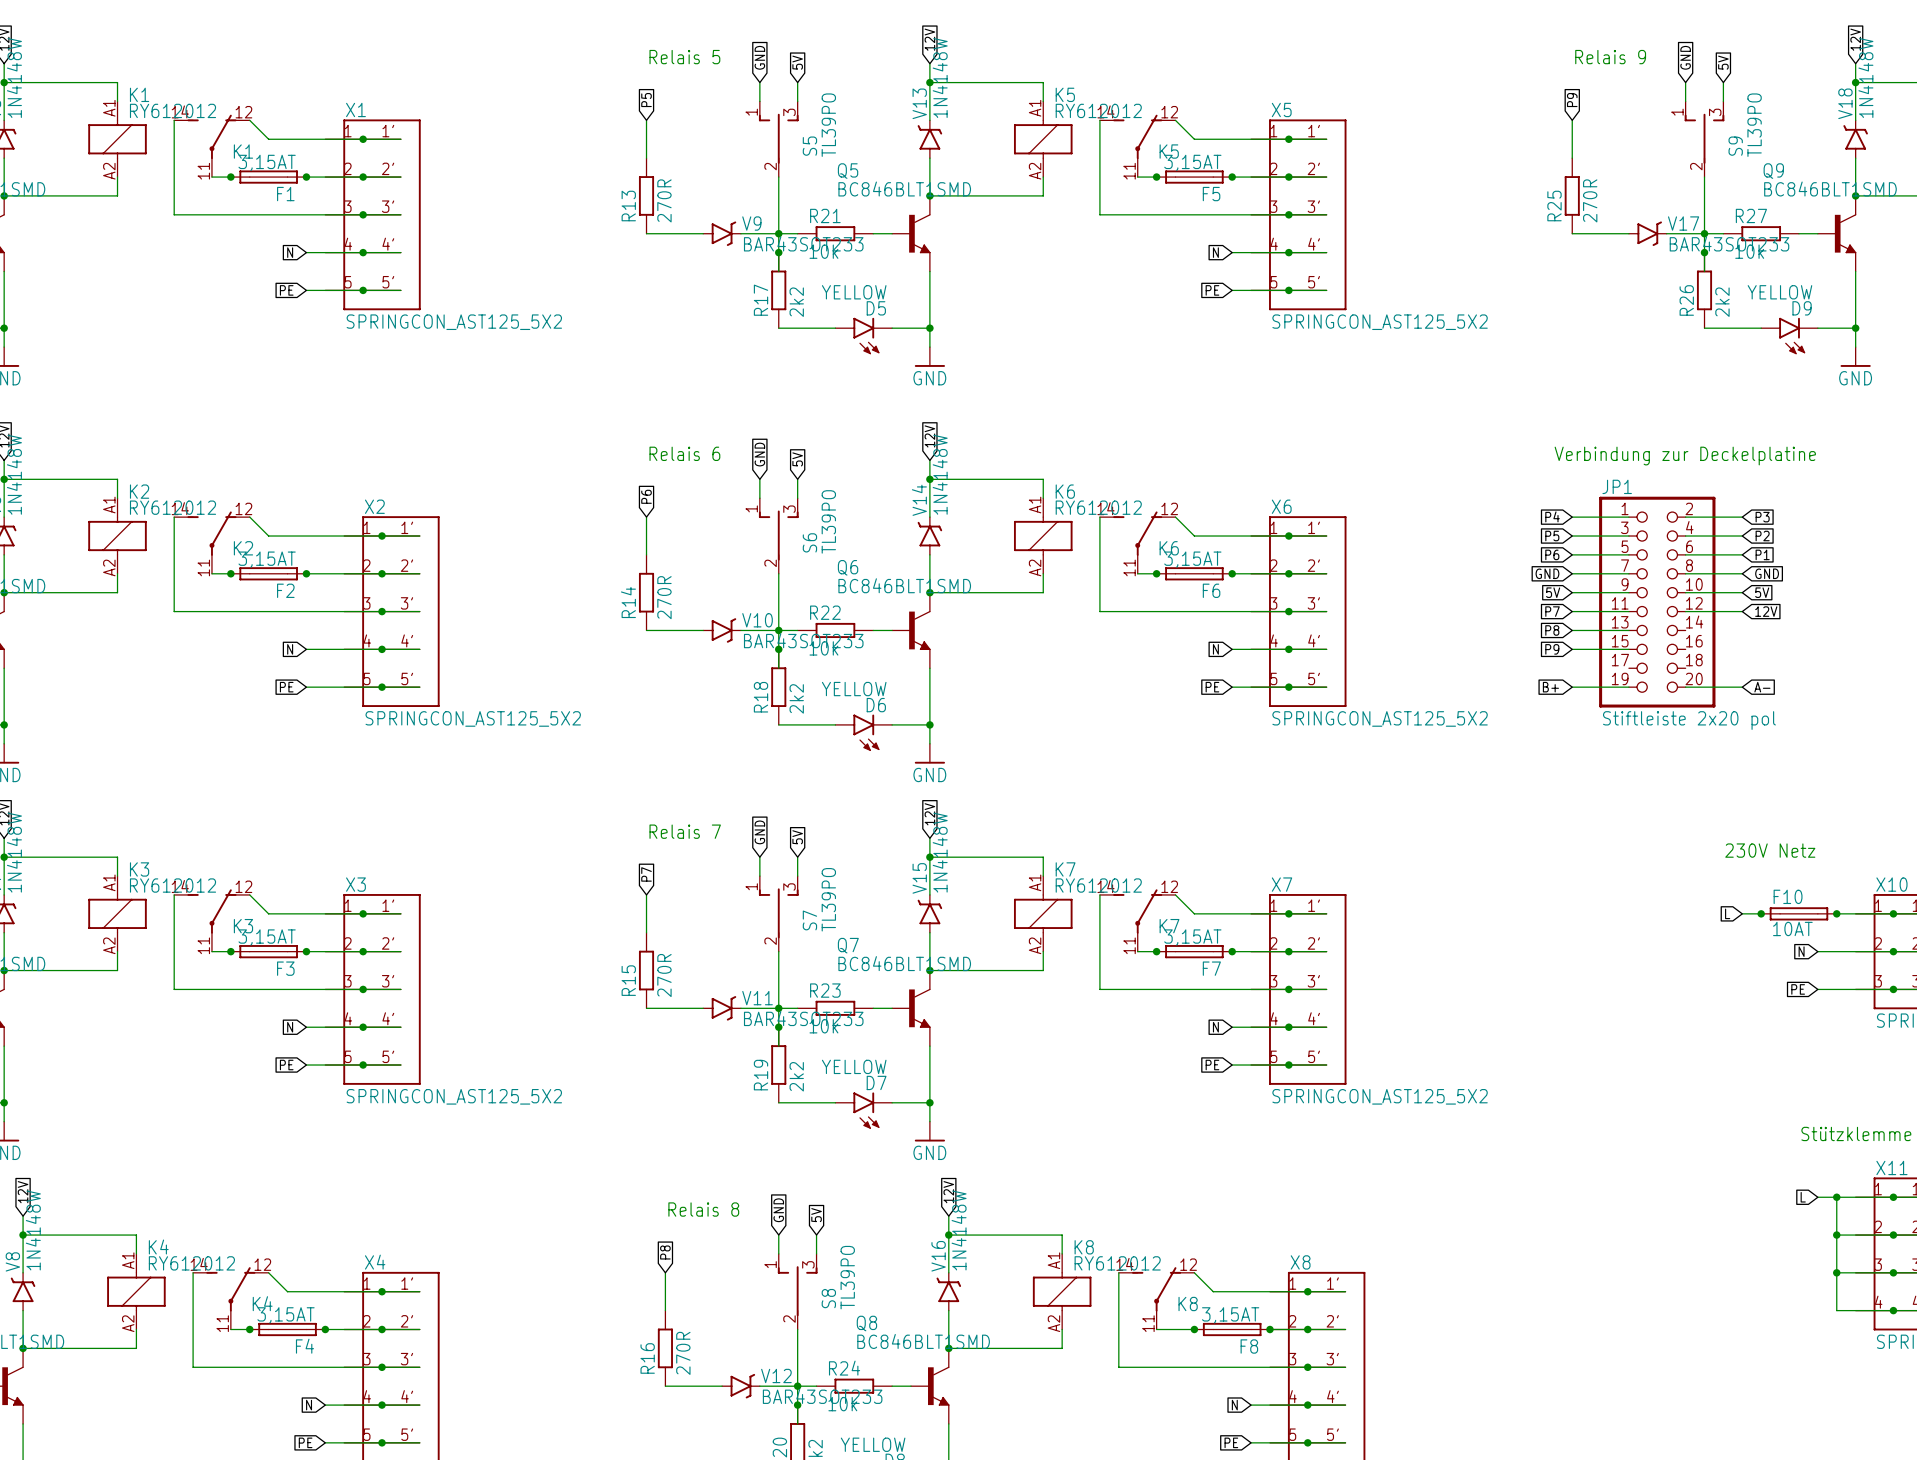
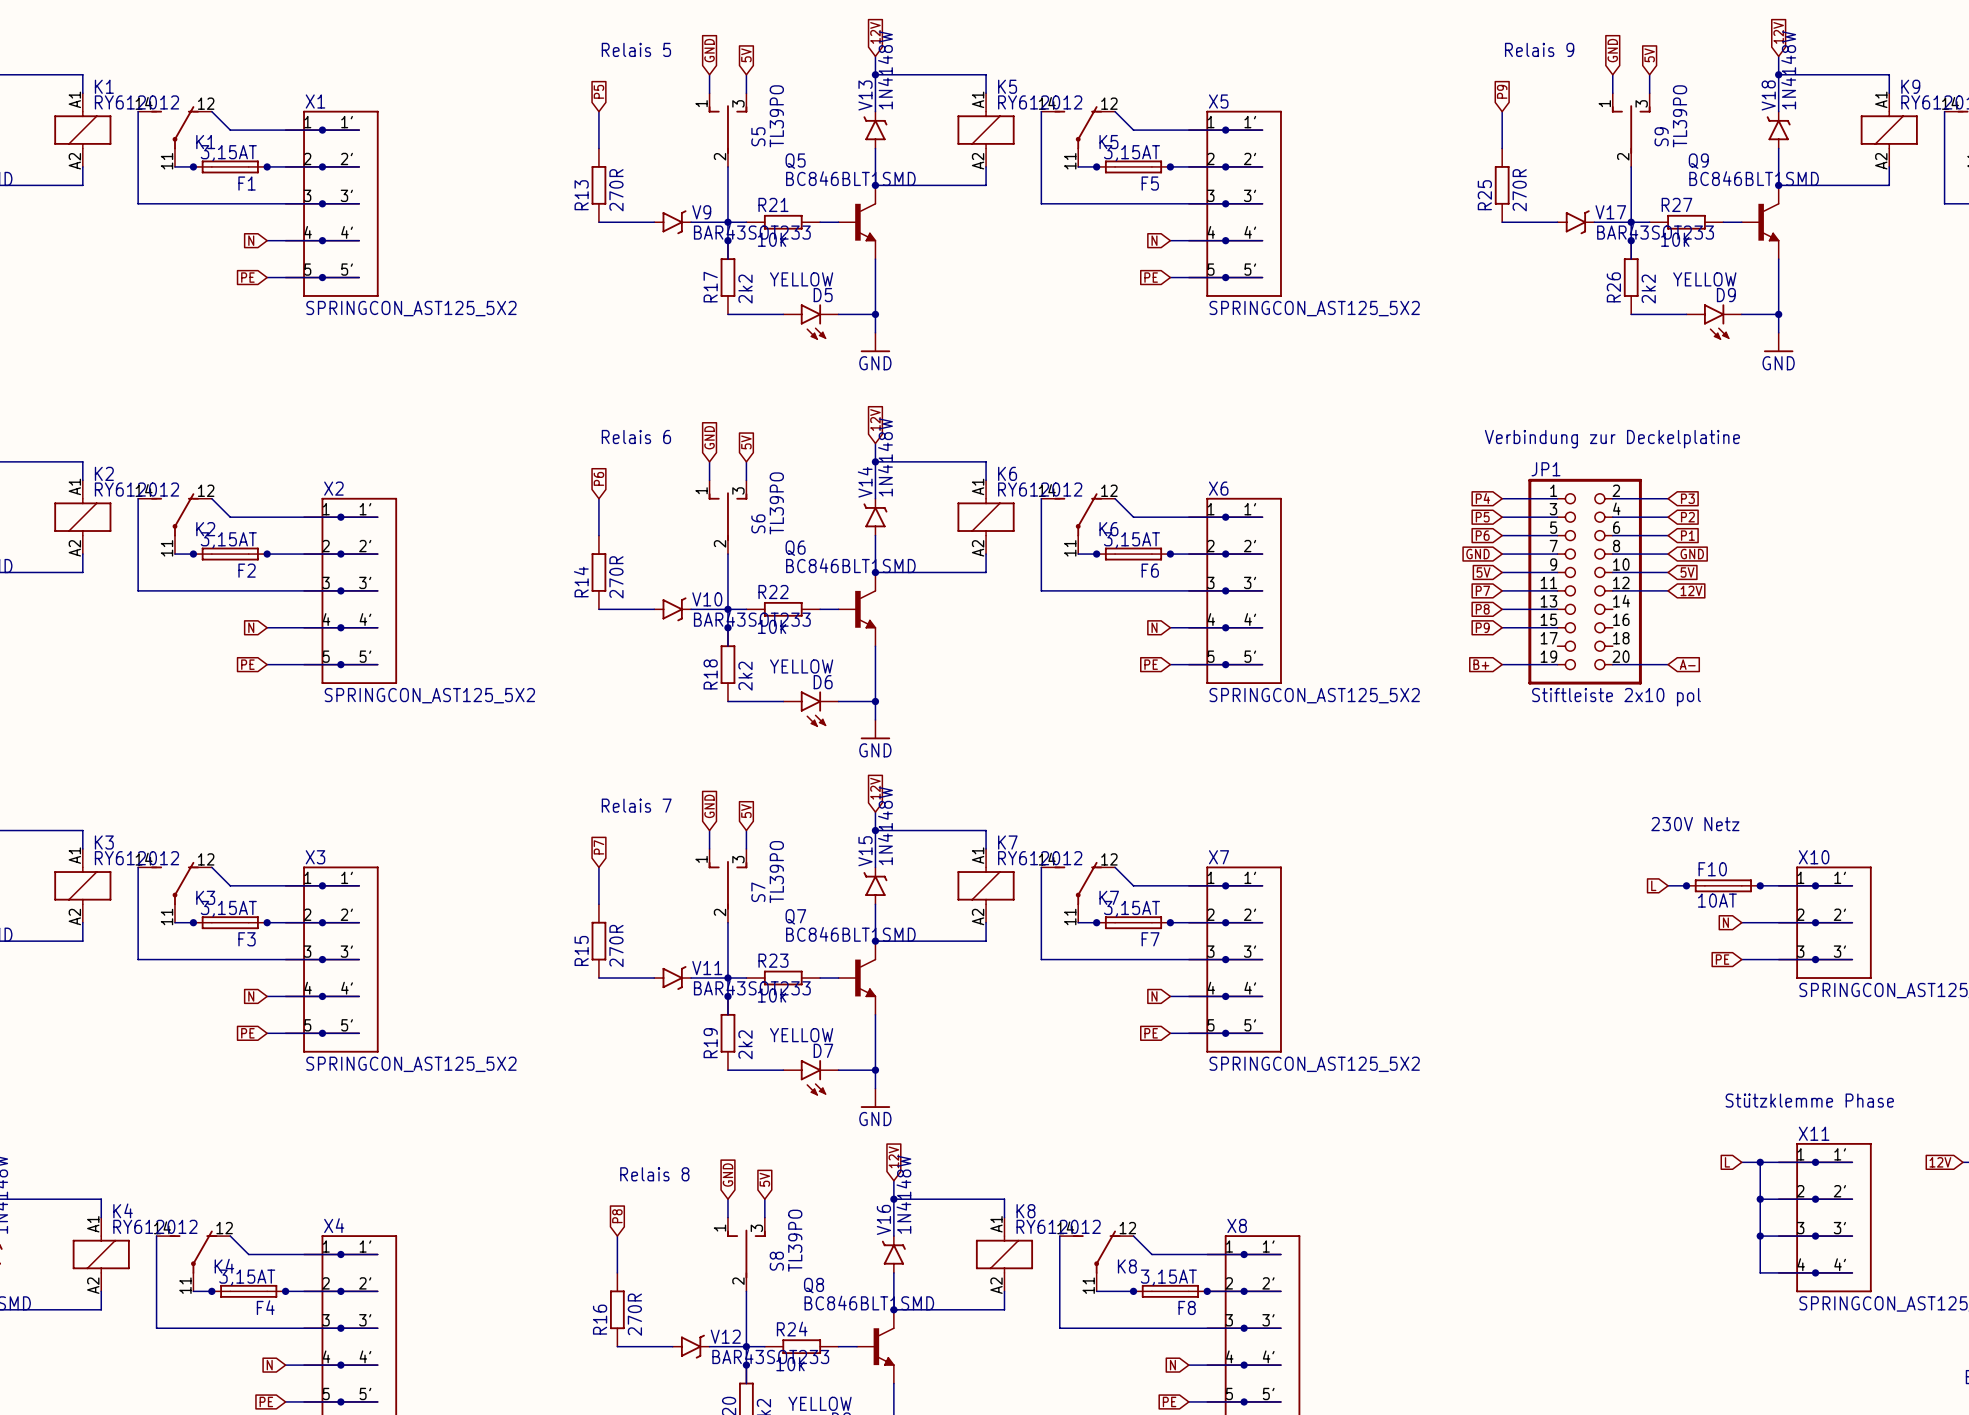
JP1 value: Stiftleiste 2x20 pol (1689, 720) -> Stiftleiste 2x10 pol (1616, 697)

